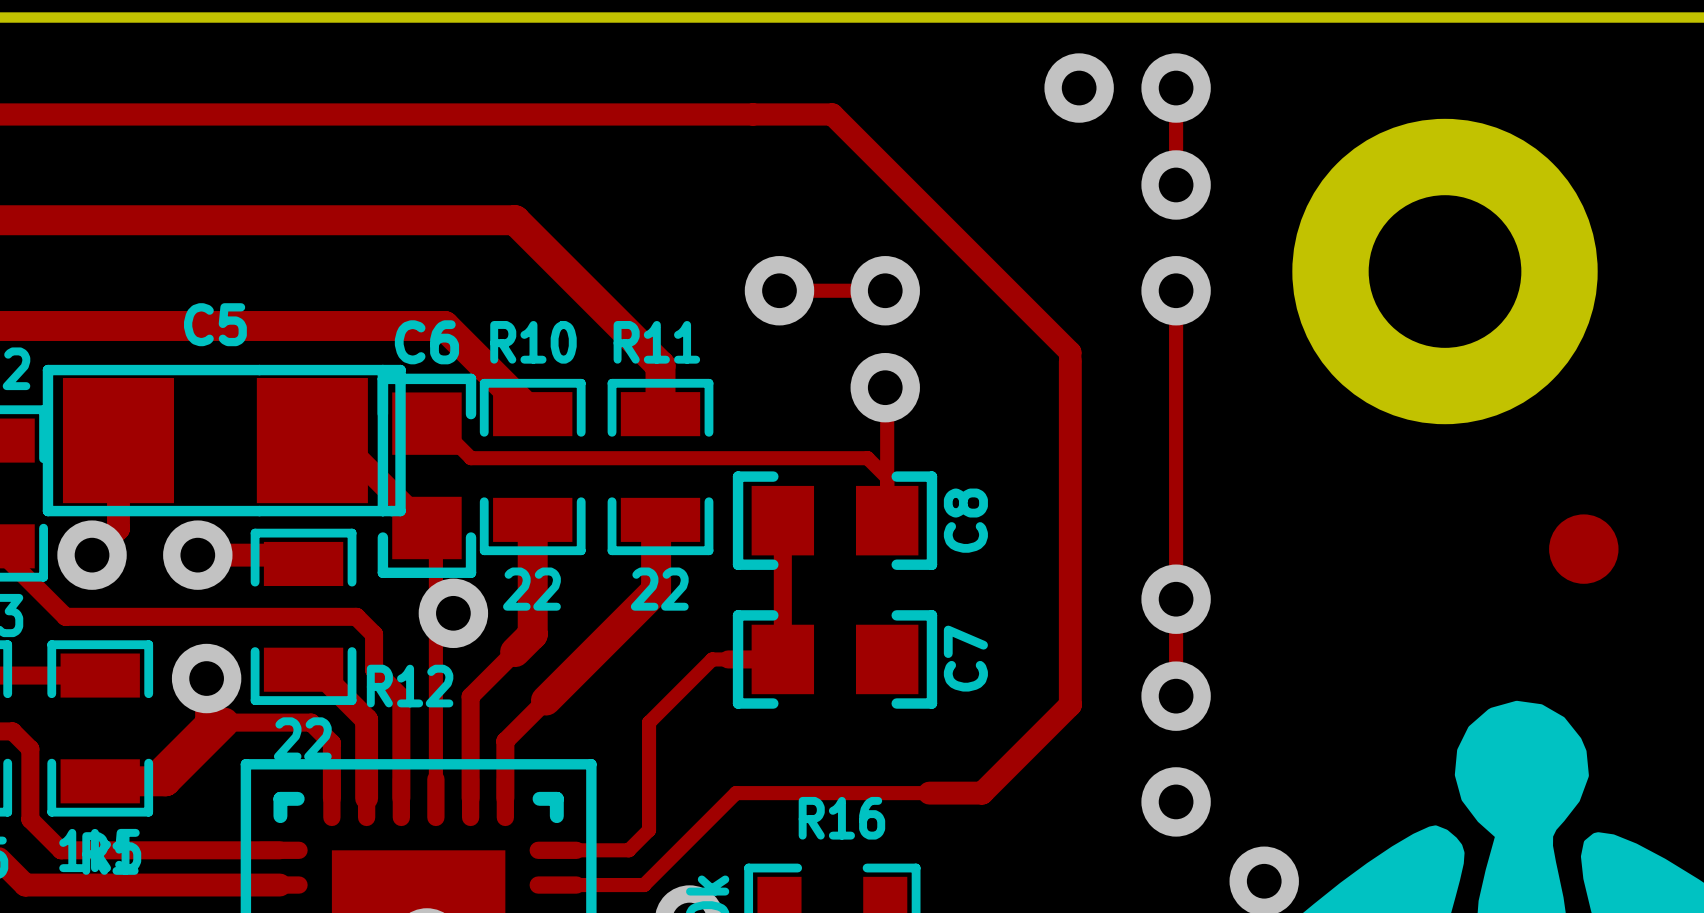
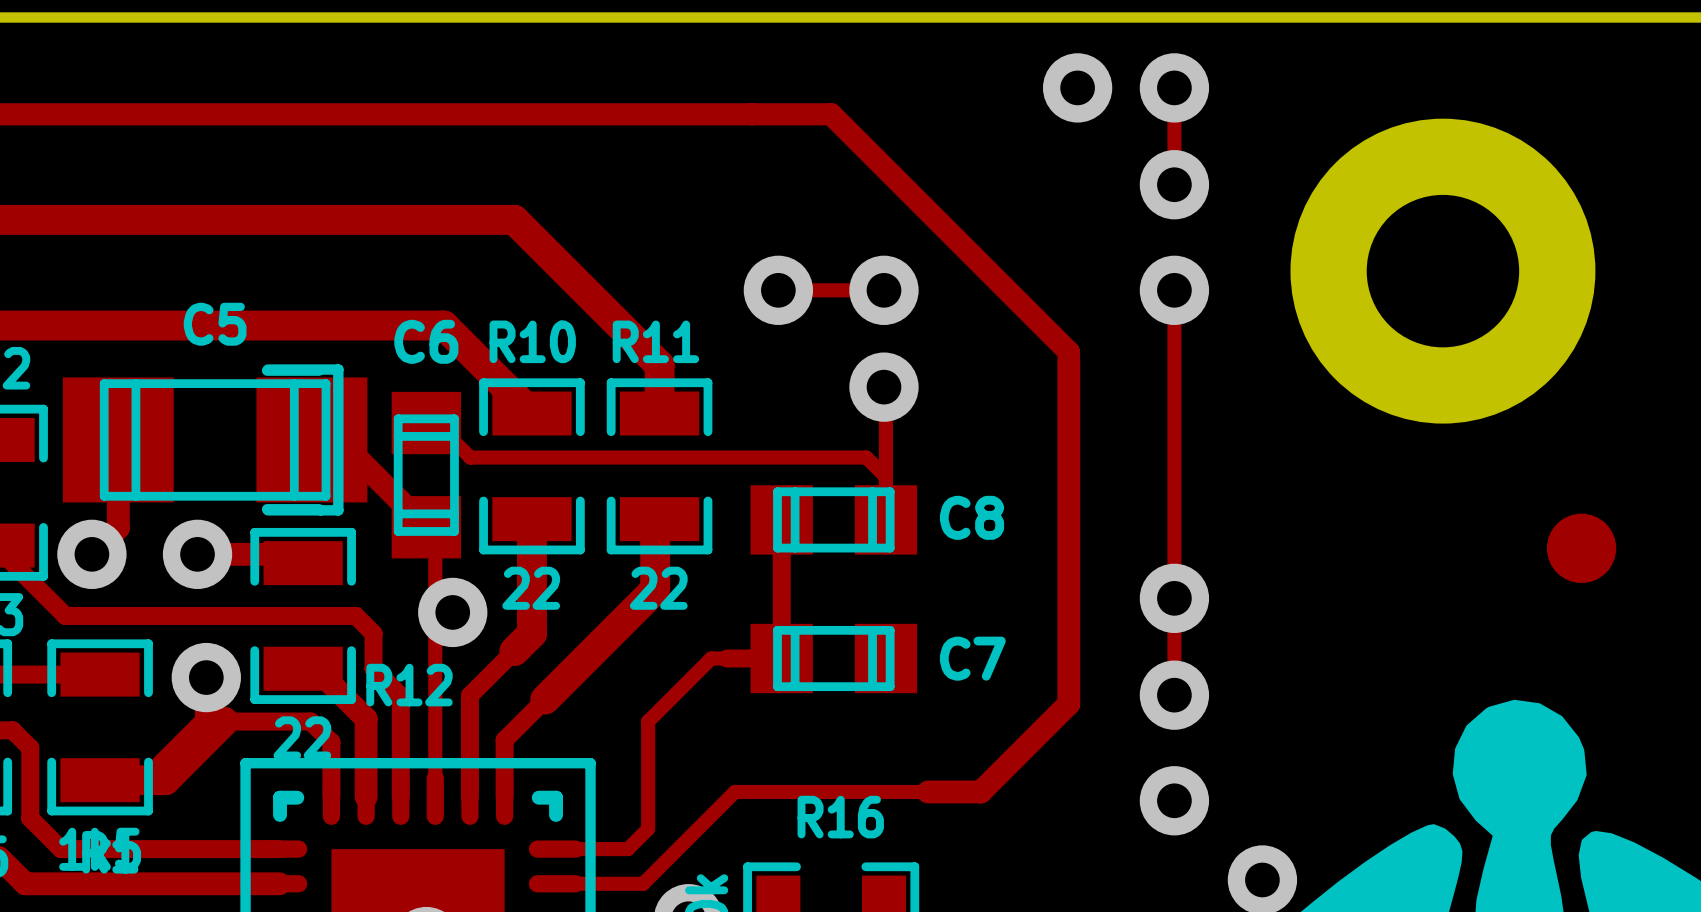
C5 footprint: [42, 364, 406, 517] -> [62, 364, 368, 516]
C6 footprint: [377, 373, 477, 578] -> [391, 391, 462, 559]
C8 footprint: [732, 471, 938, 570] -> [750, 485, 918, 555]
C8 name rotation: 0° (965, 520) -> 90° clockwise (972, 517)
C7 footprint: [732, 610, 938, 709] -> [750, 623, 918, 694]
C7 name rotation: 0° (965, 658) -> 90° clockwise (972, 658)

